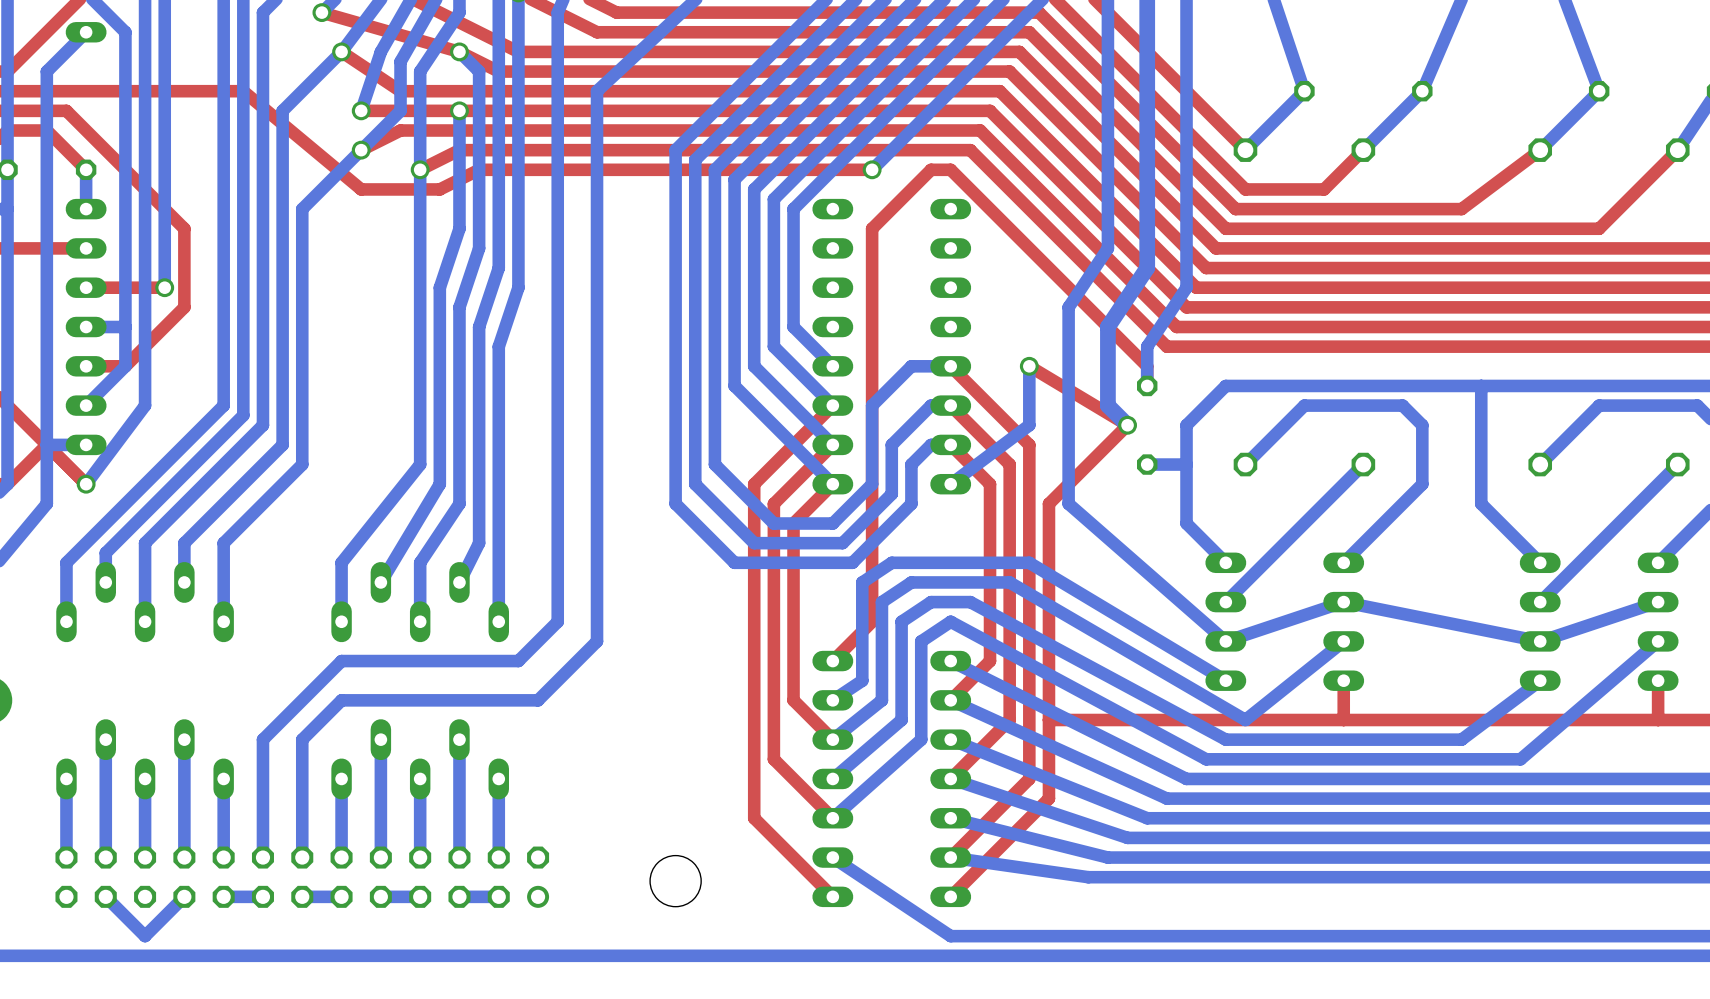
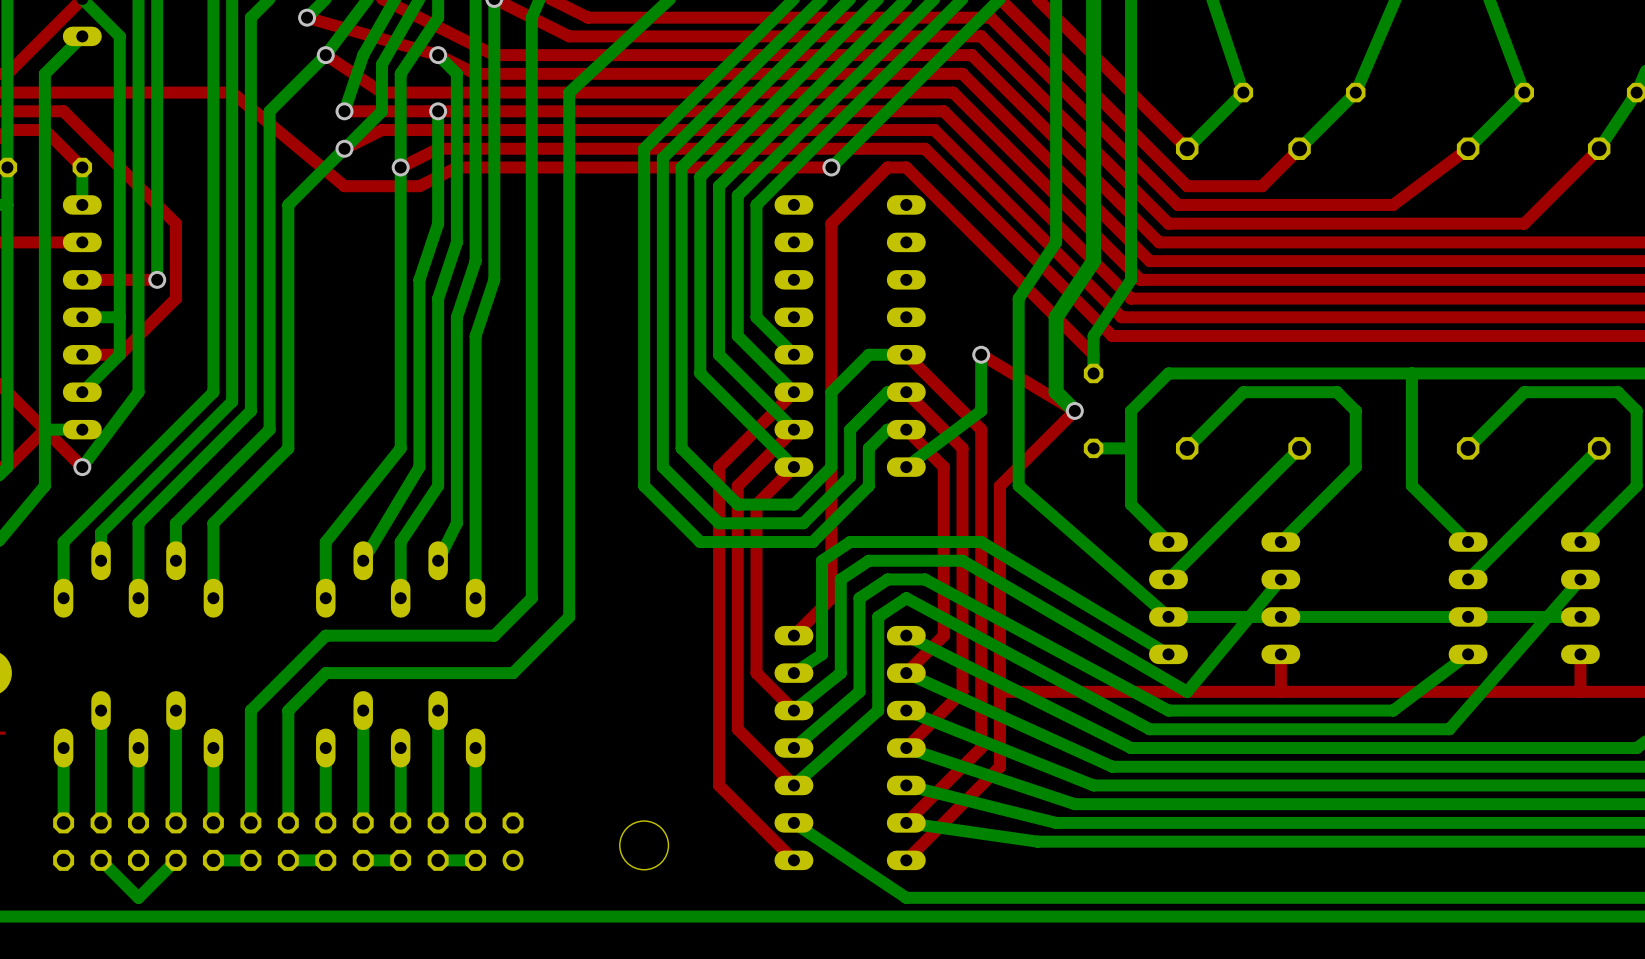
bottom track: (1658, 602) (1540, 641) (1343, 602) (1225, 641) -> (1580, 616) (1168, 616)
bottom track: (1343, 641) (1245, 720) -> (1280, 579) (1187, 691)
bottom track: (1658, 641) (1520, 759) -> (1580, 579) (1449, 729)

